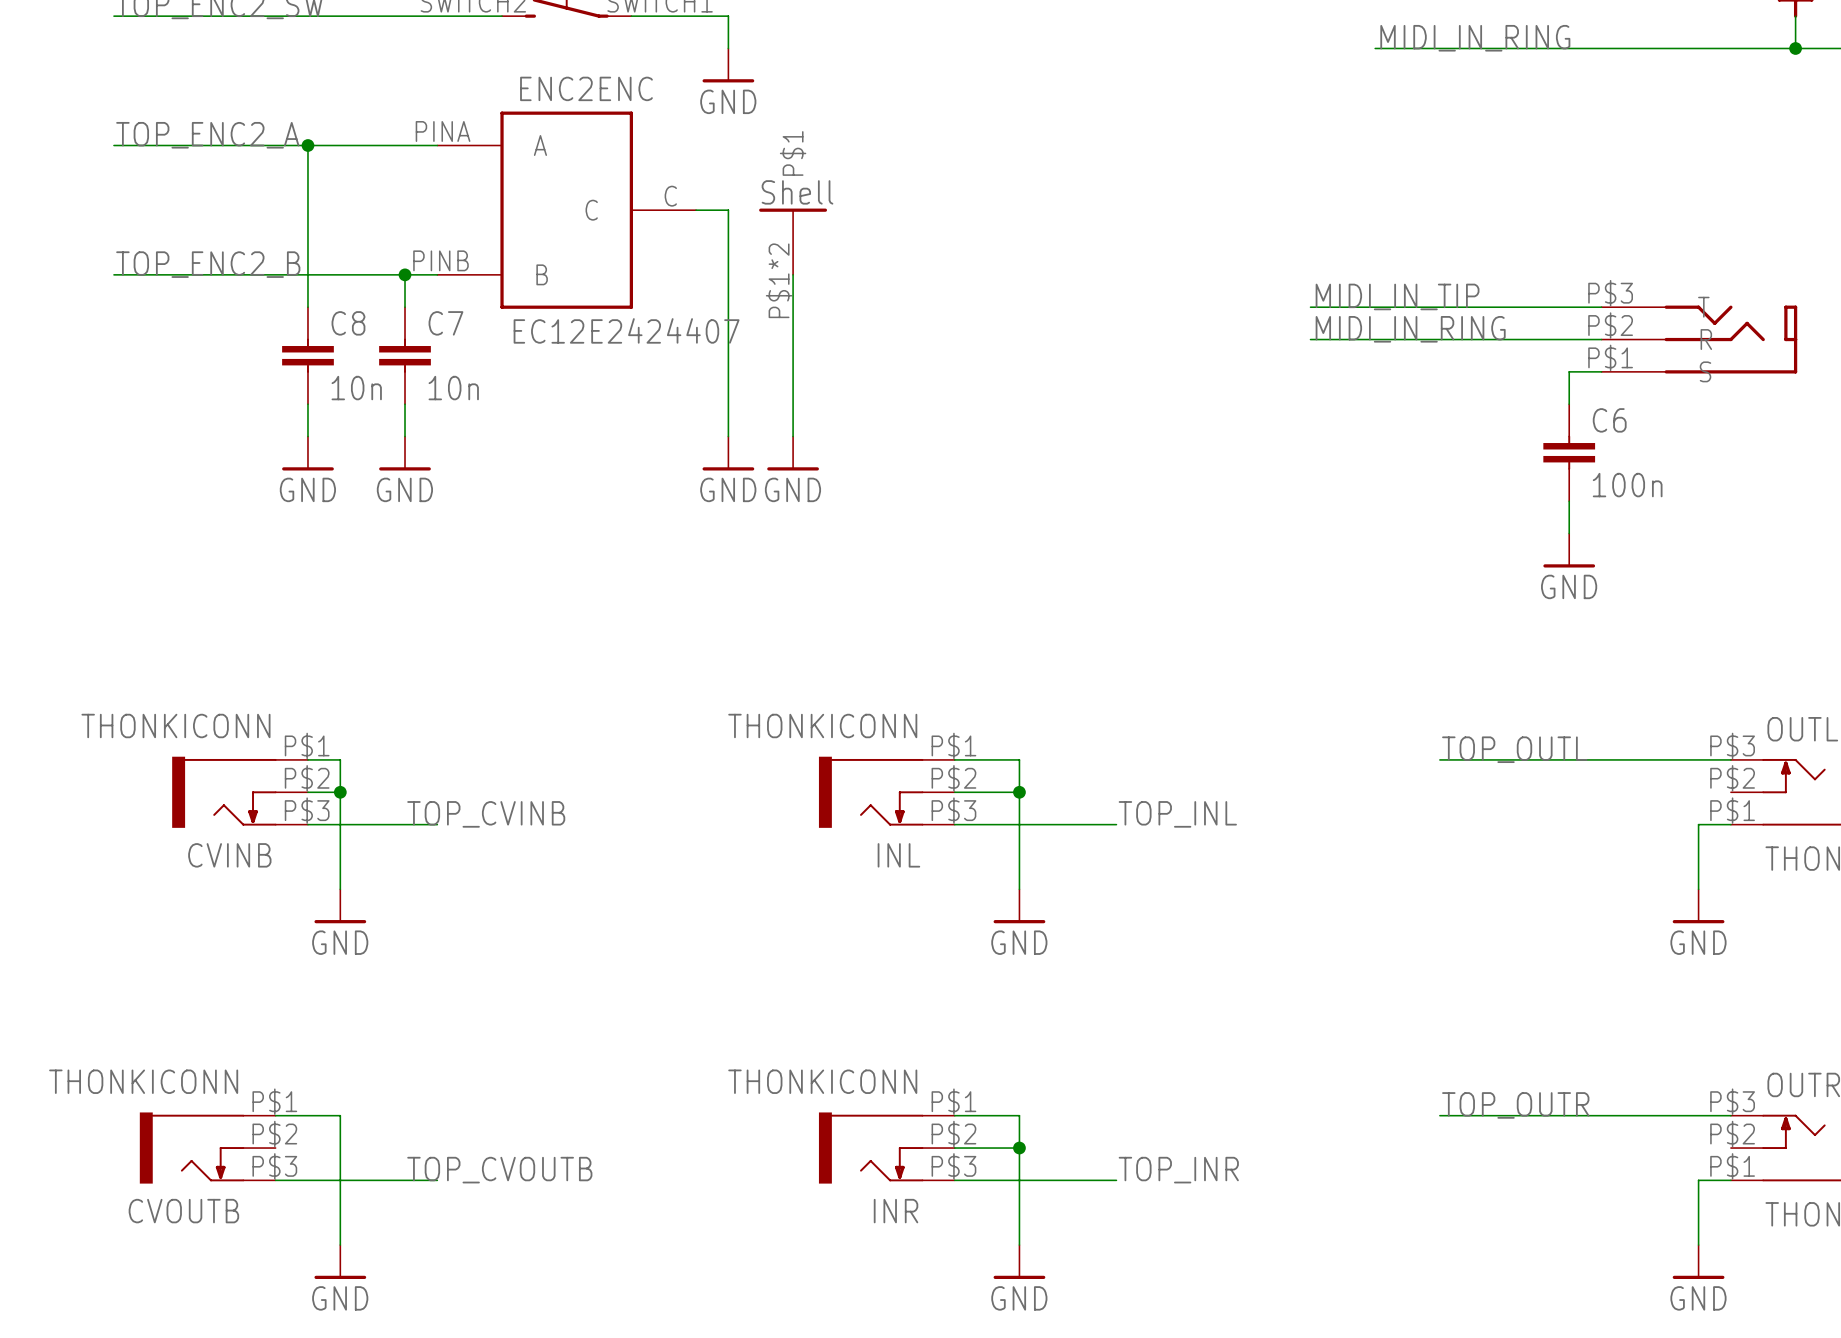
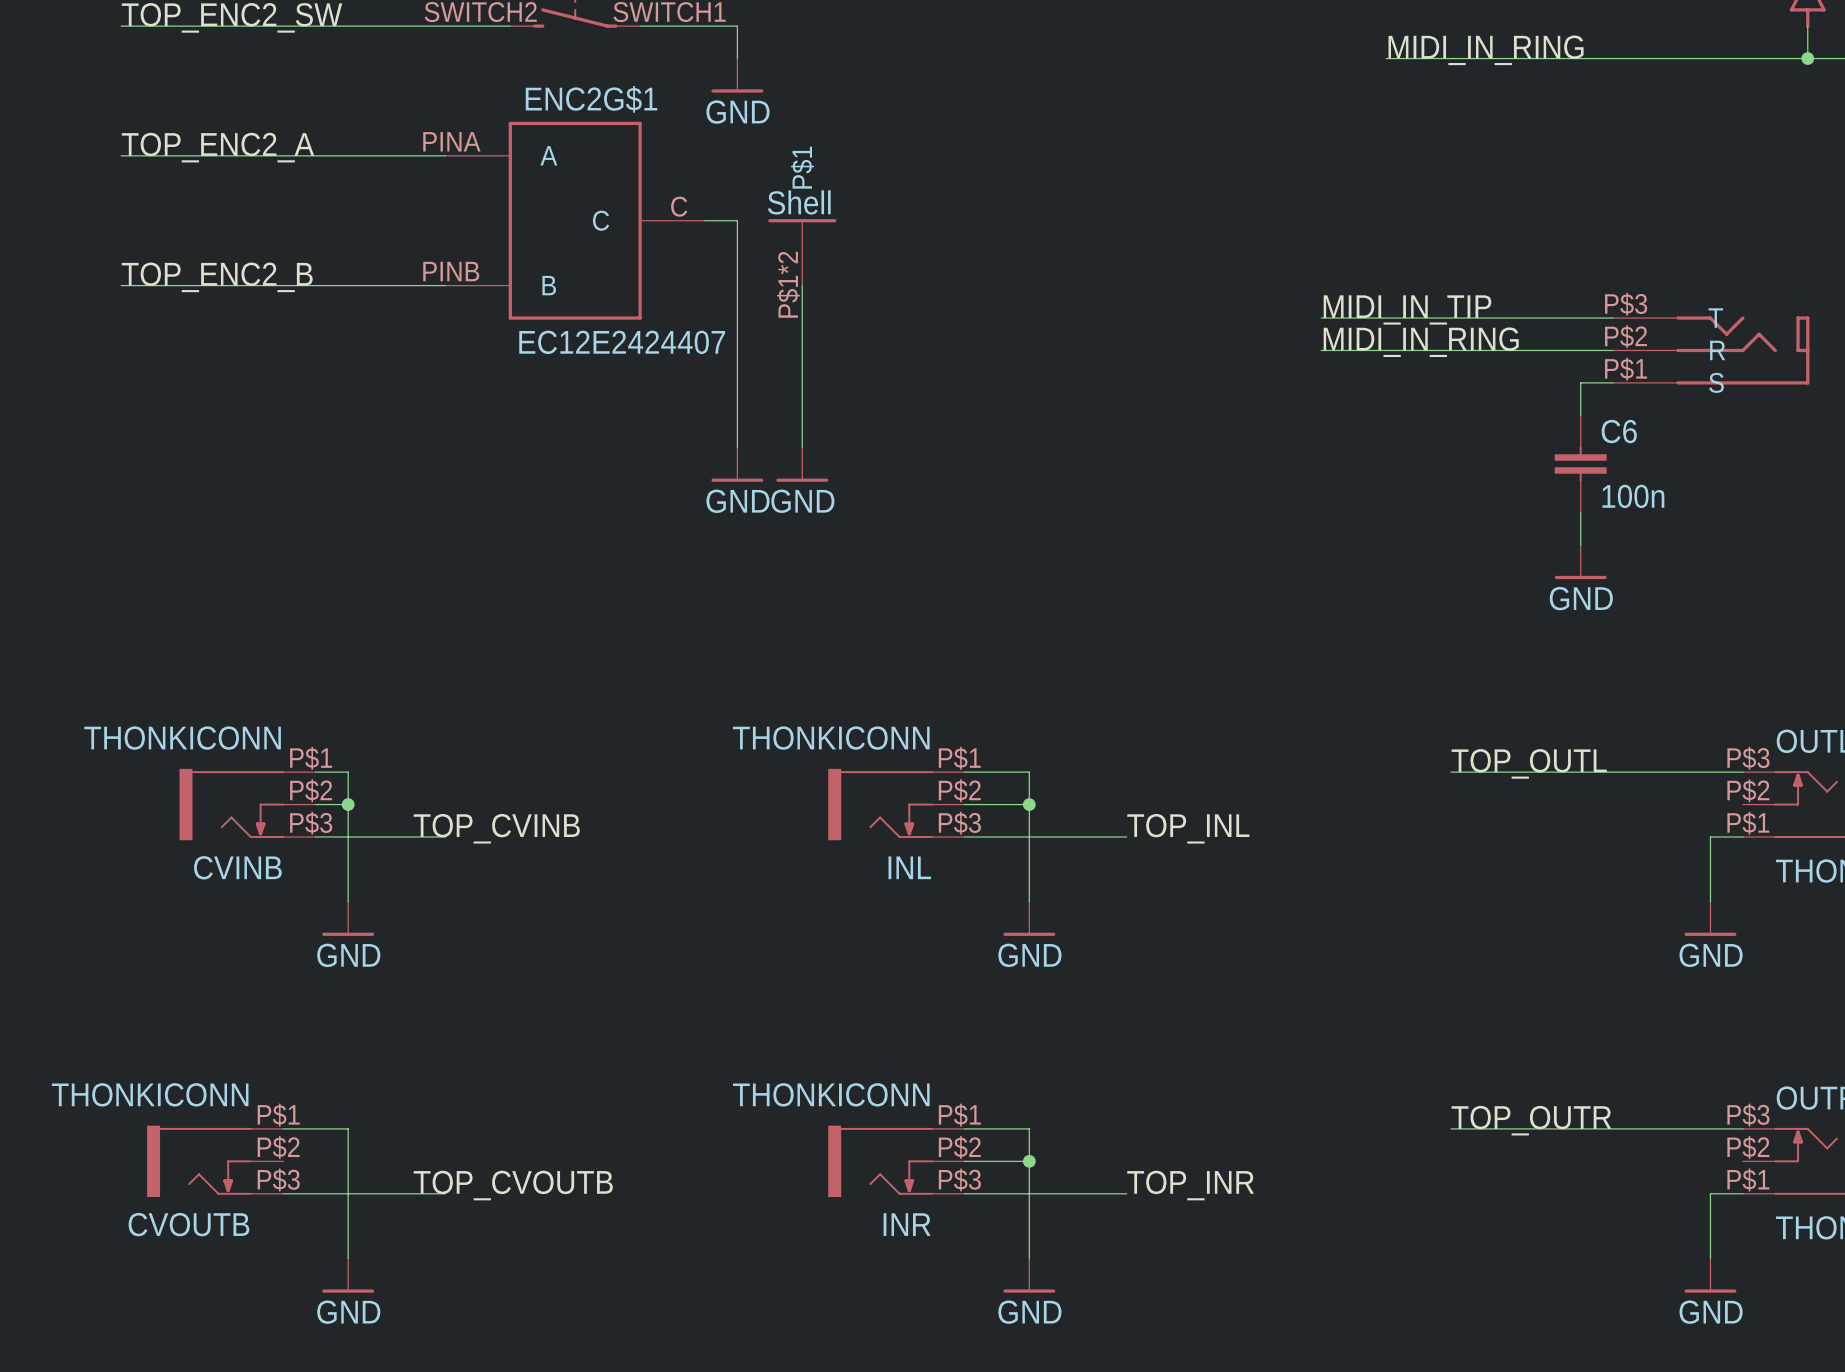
ENC2ENC name: ENC2ENC (586, 88) -> ENC2G$1 (591, 99)
wire: (307, 145) (307, 307) -> none
junction: (307, 145) -> none
wire: (405, 274) (405, 307) -> none
junction: (405, 274) -> none
C8: 10n (307, 355) -> none
C7: 10n (405, 355) -> none
wire: (307, 404) (307, 436) -> none
wire: (405, 404) (405, 436) -> none
power symbol: GND (307, 453) -> none
power symbol: GND (405, 453) -> none

